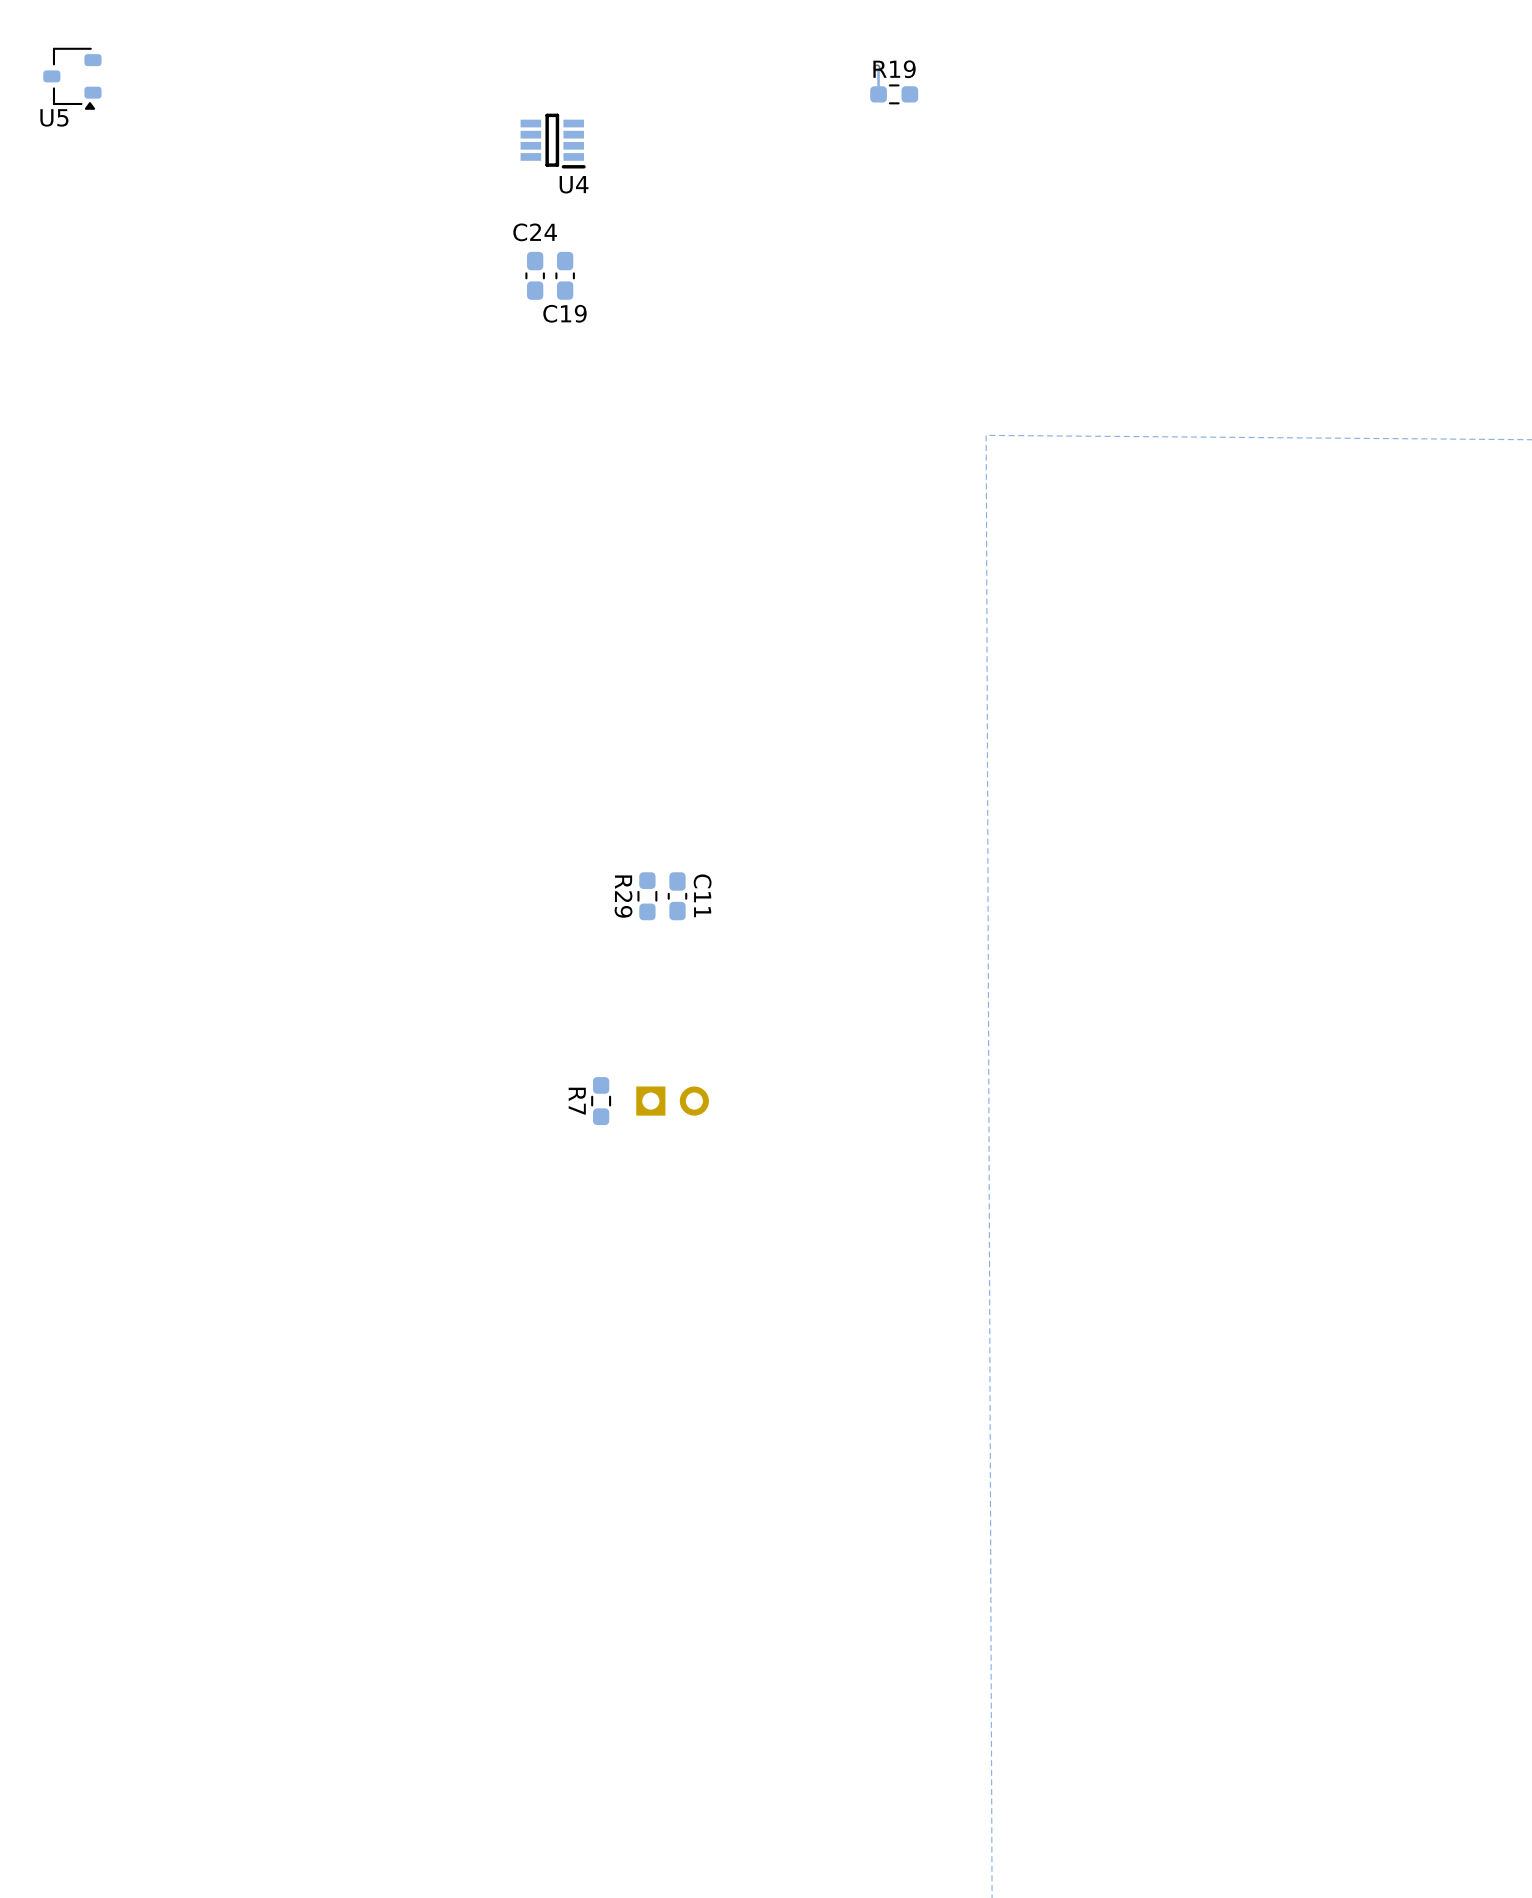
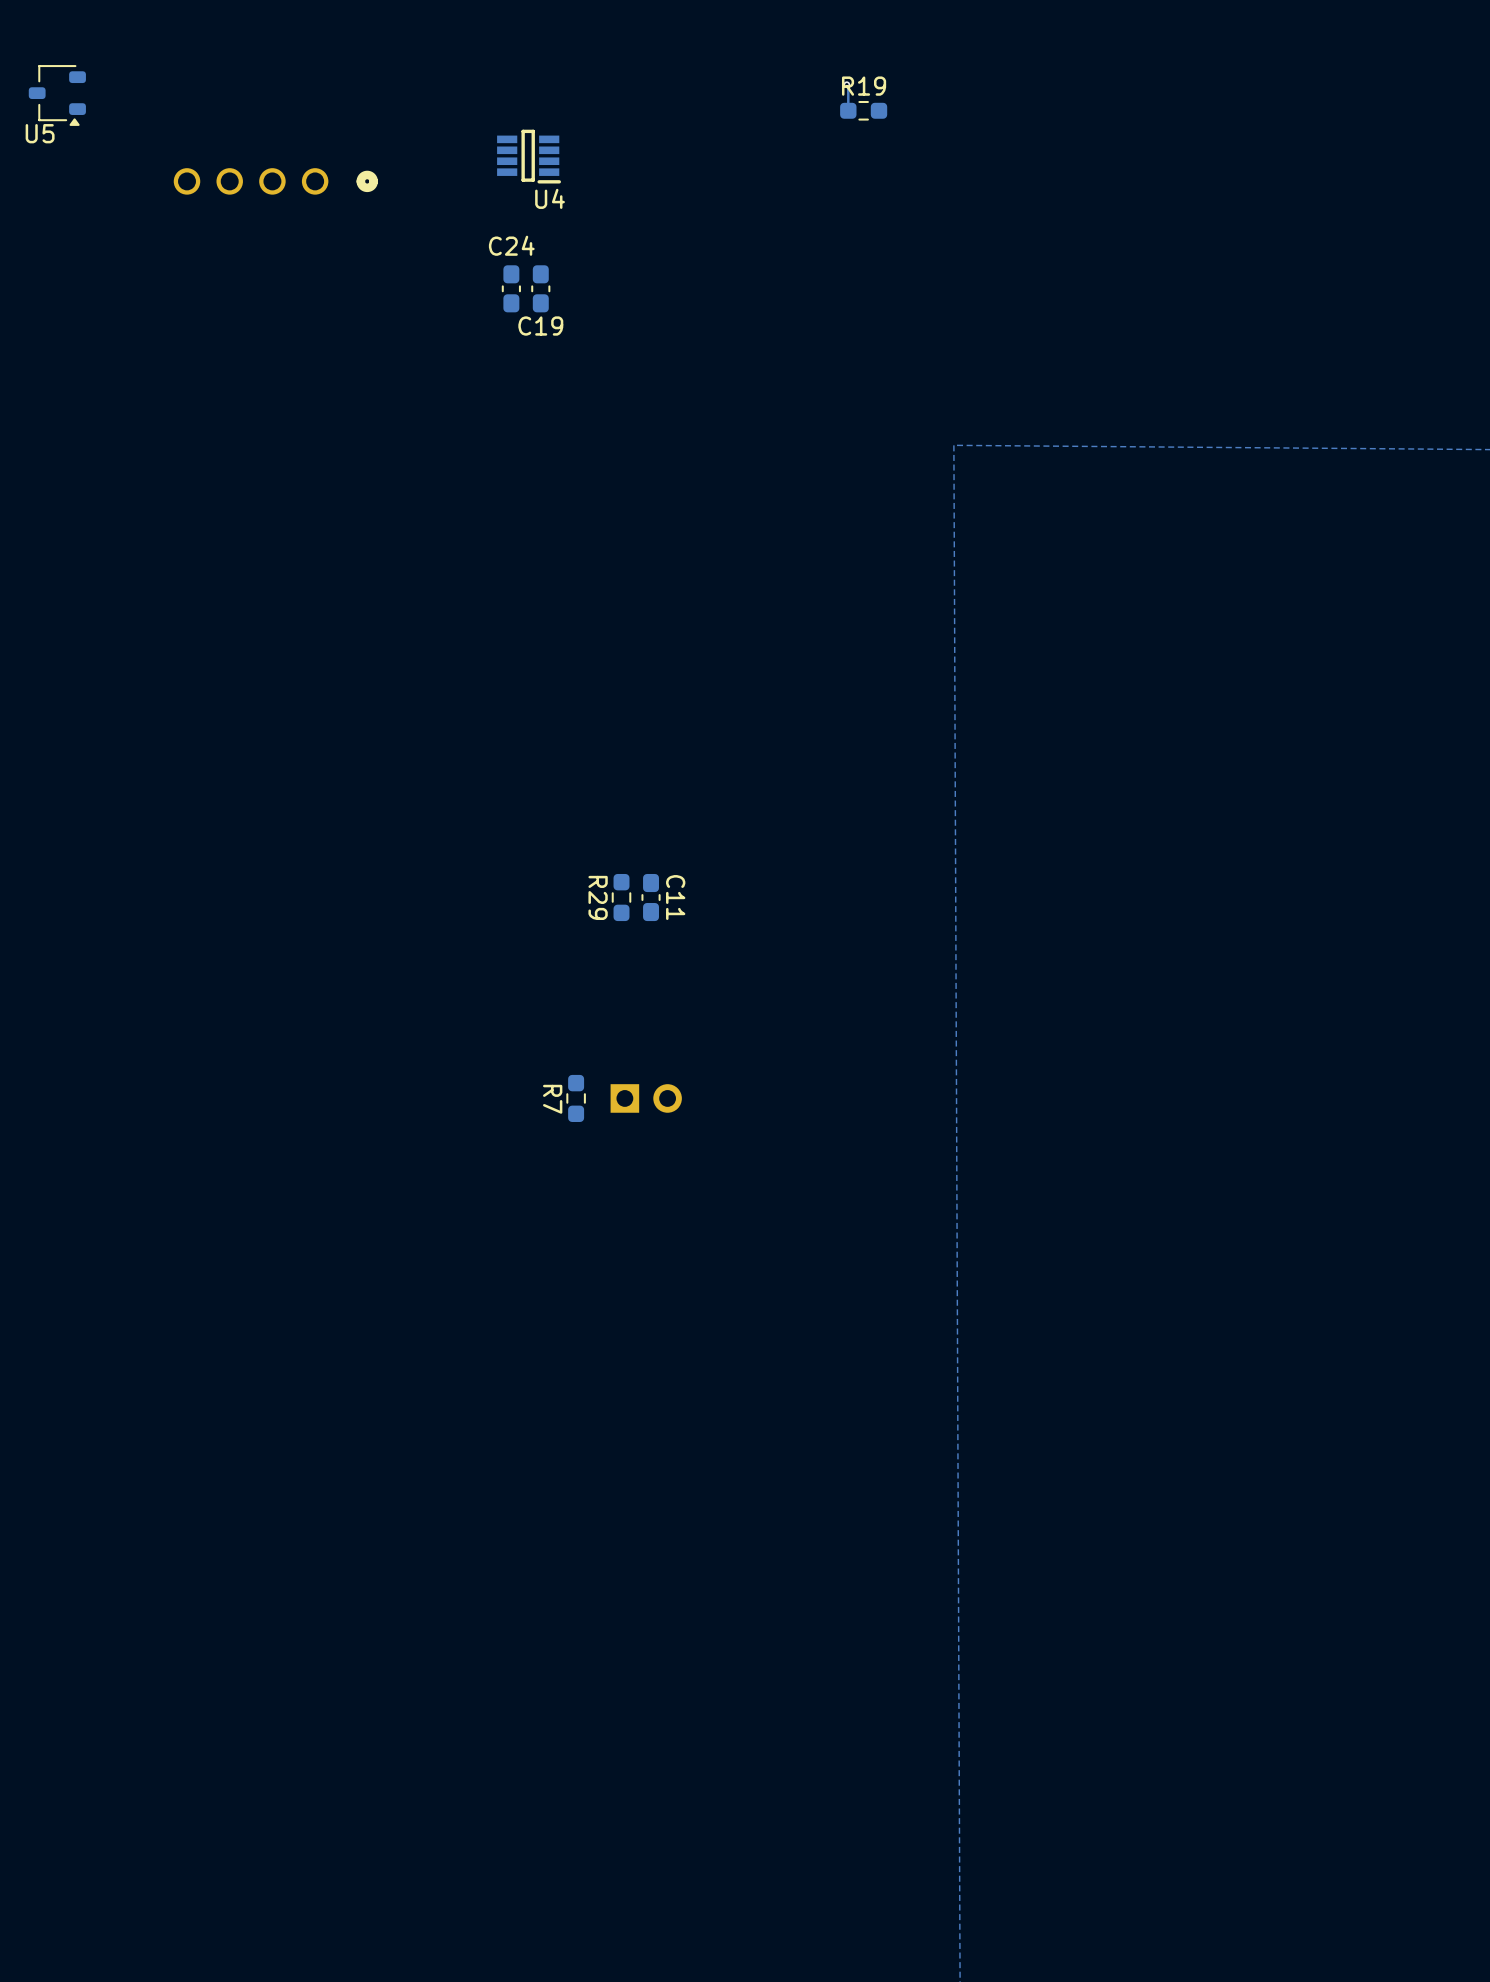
part: none -> (275, 181)

